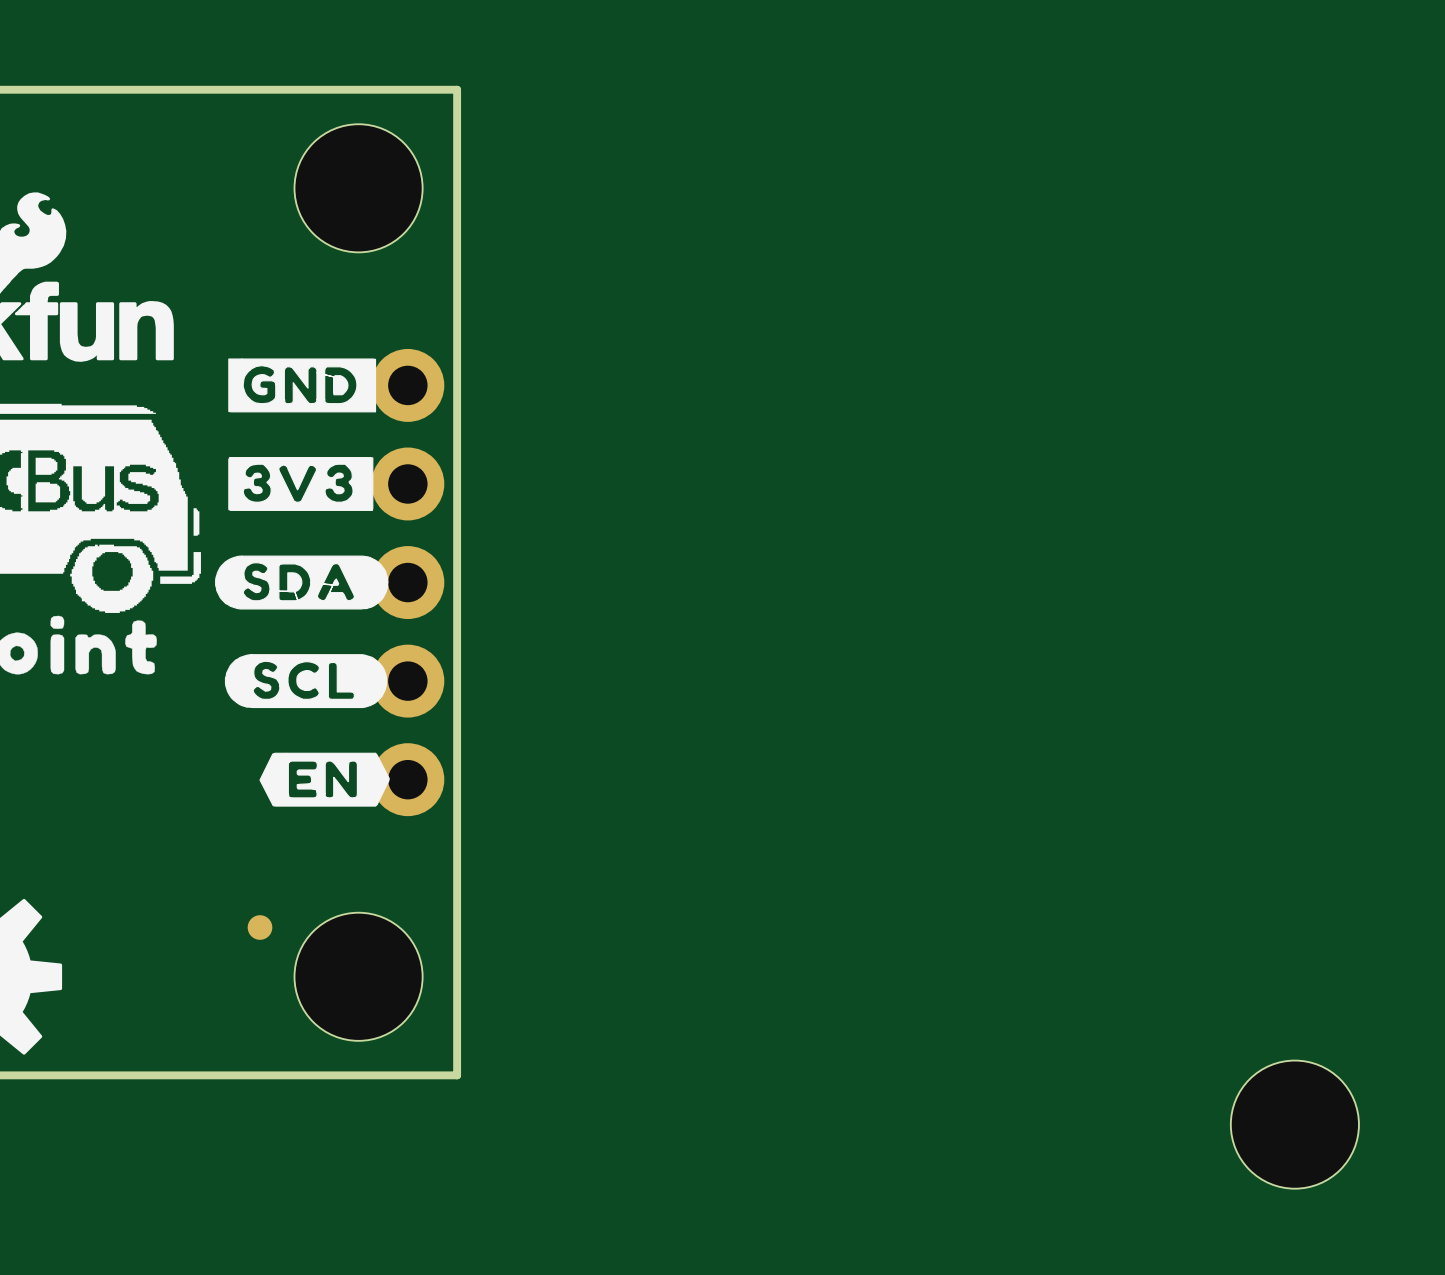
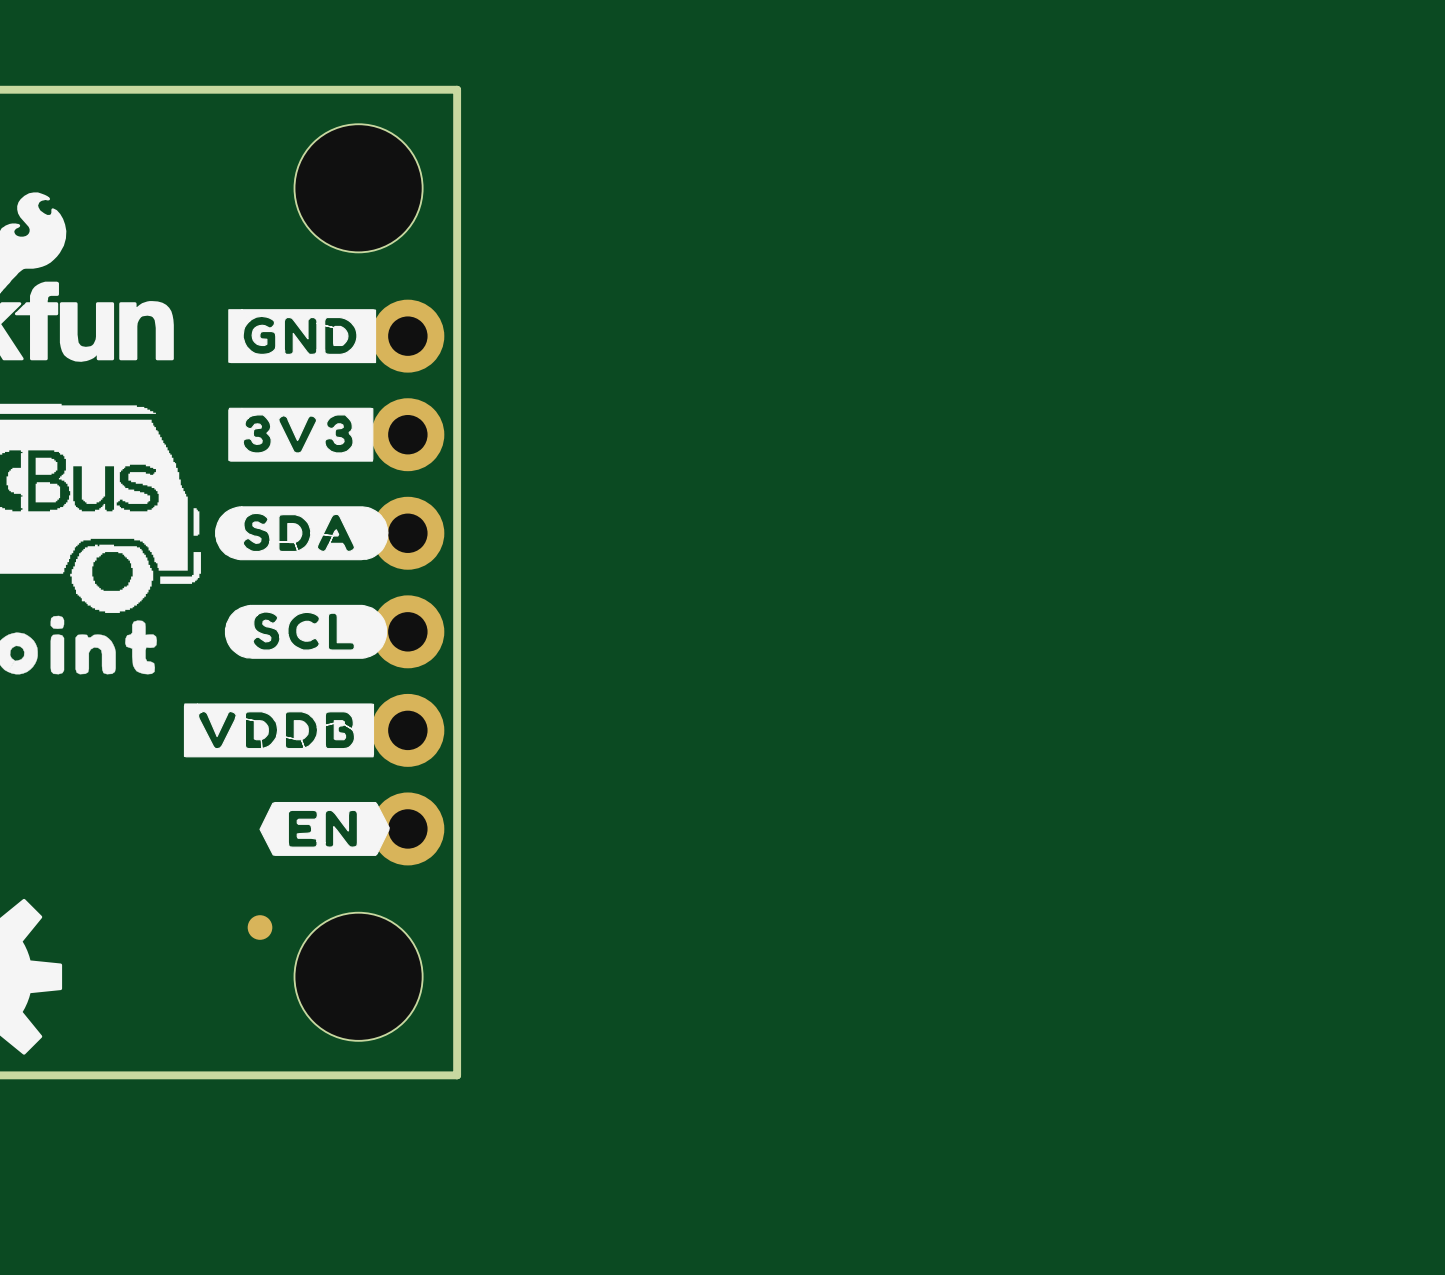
drawing position: (302, 385) -> (302, 336)
drawing position: (300, 483) -> (300, 434)
part position: (407, 533) -> (407, 483)
drawing position: (301, 582) -> (301, 533)
drawing position: (306, 681) -> (306, 631)
drawing: none -> [183, 703, 375, 758]
part footprint: [371, 743, 445, 817] -> [371, 693, 445, 866]
drawing position: (324, 779) -> (324, 828)
part: (1294, 1124) -> none

